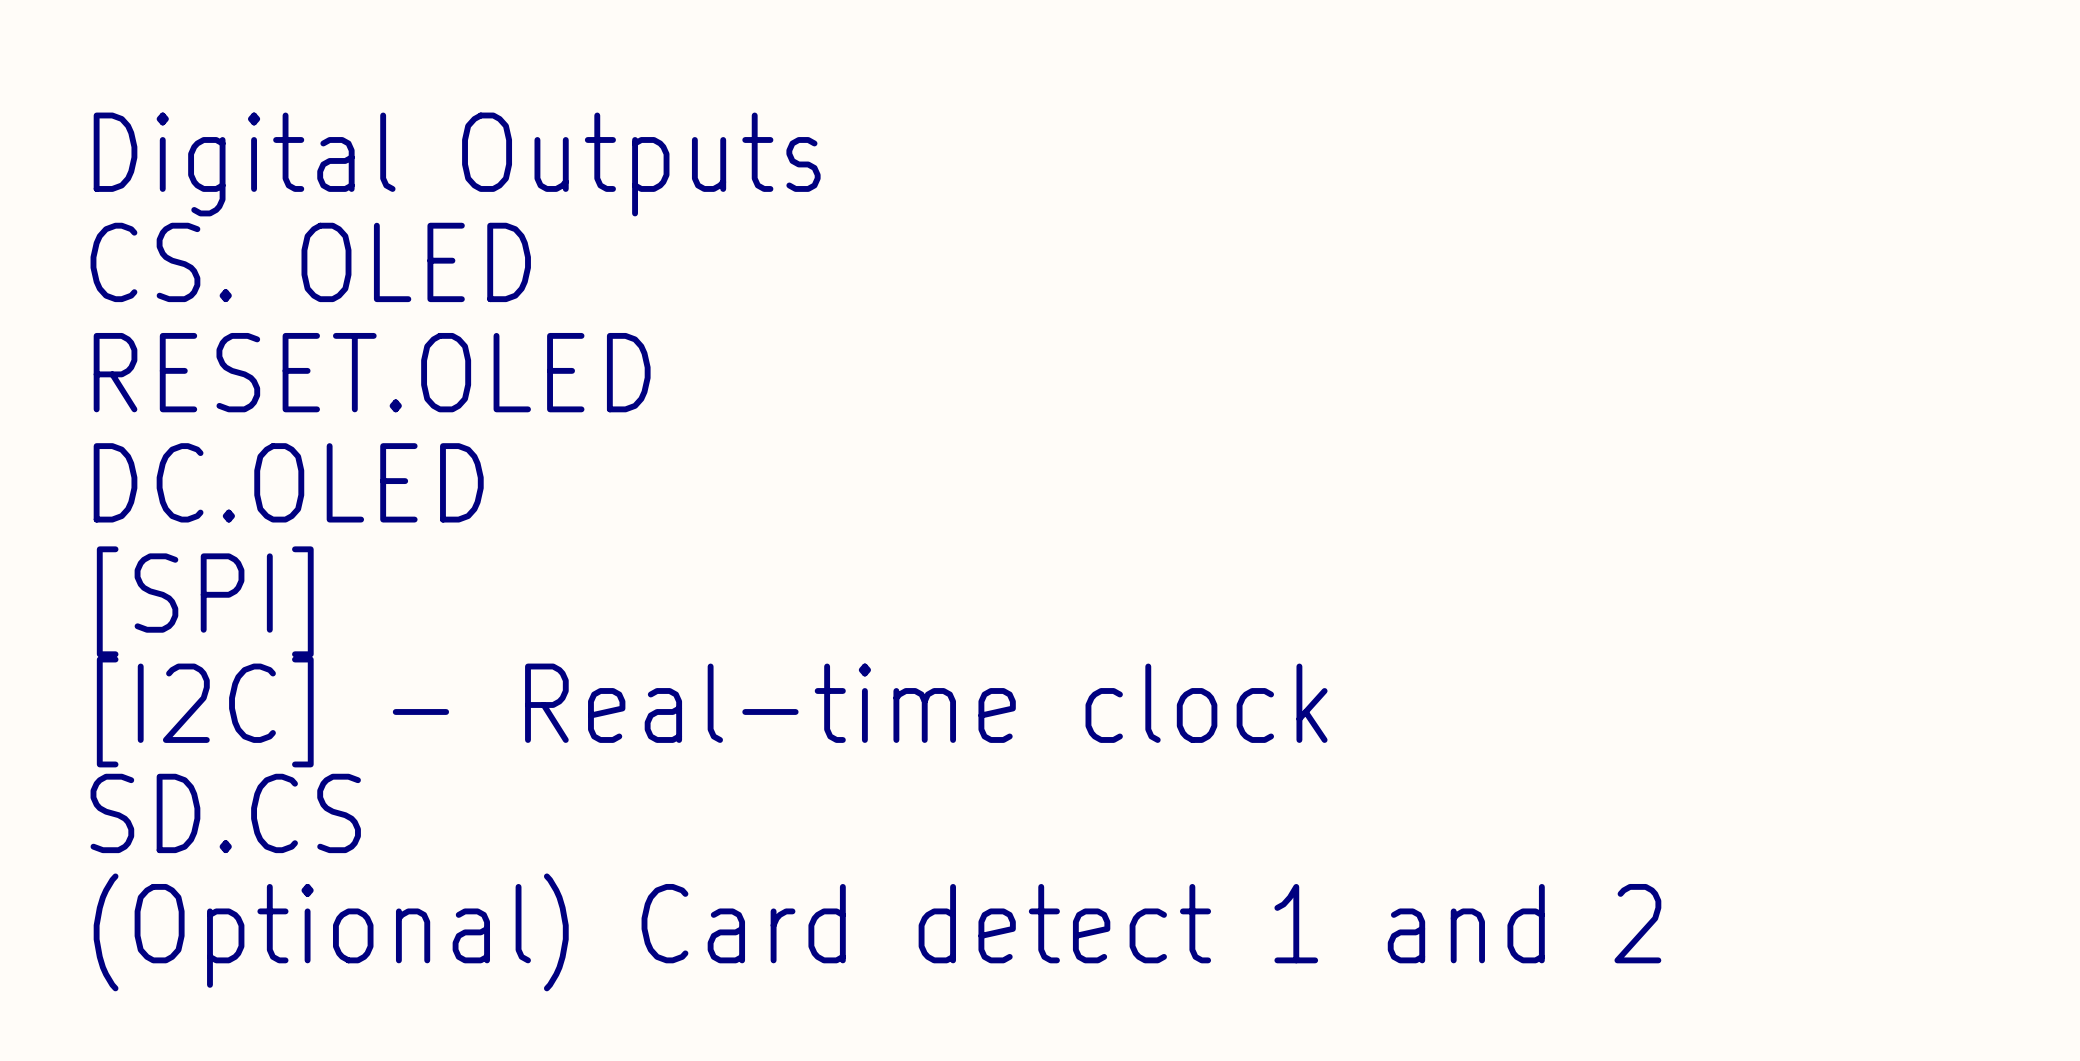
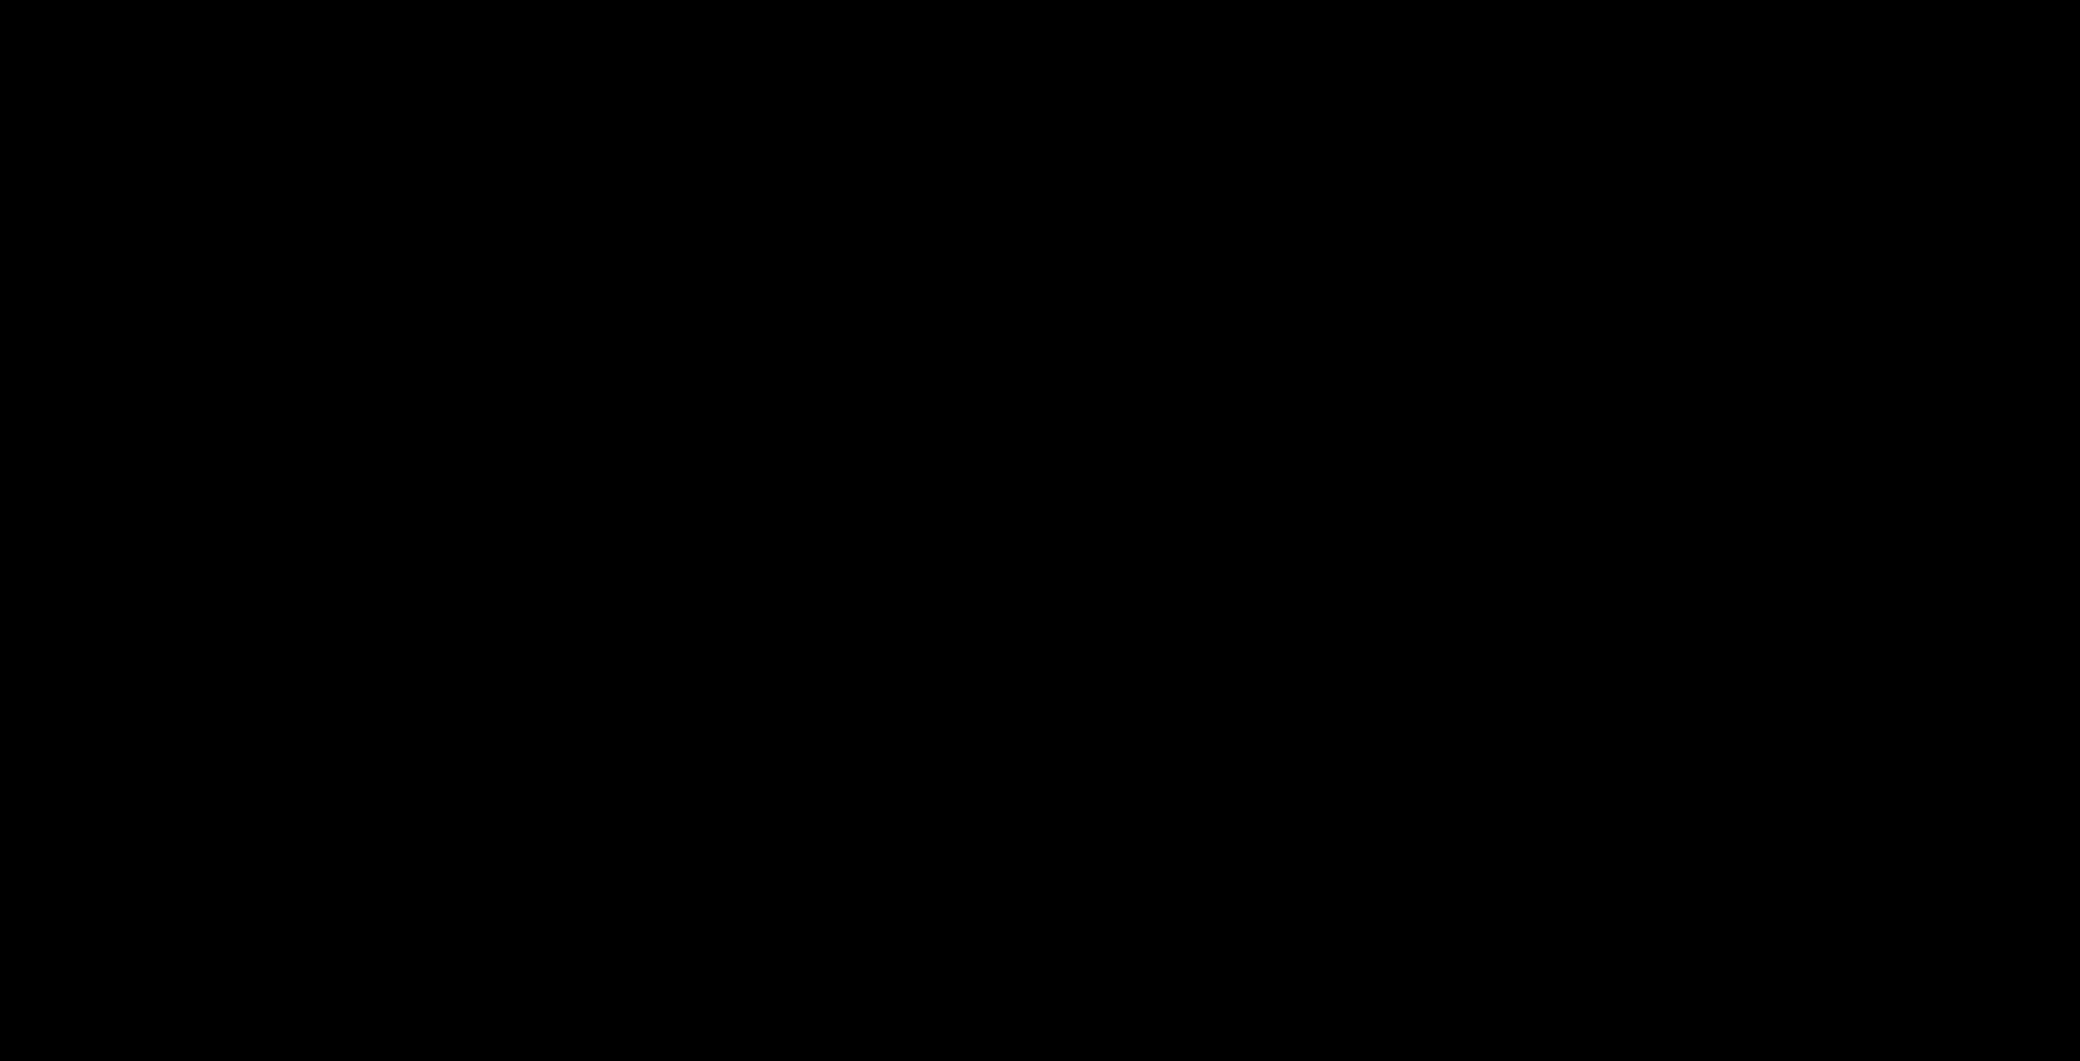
text: Digital Outputs (457, 164) -> none
text: CS. OLED (310, 262) -> none
text: RESET.OLED (372, 372) -> none
text: DC.OLED (288, 482) -> none
text: [SPI] (205, 601) -> none
text: [I2C] - Real-time clock (712, 711) -> none
text: SD.CS (225, 813) -> none
text: (Optional) Card detect 1 and 2 (877, 932) -> none

